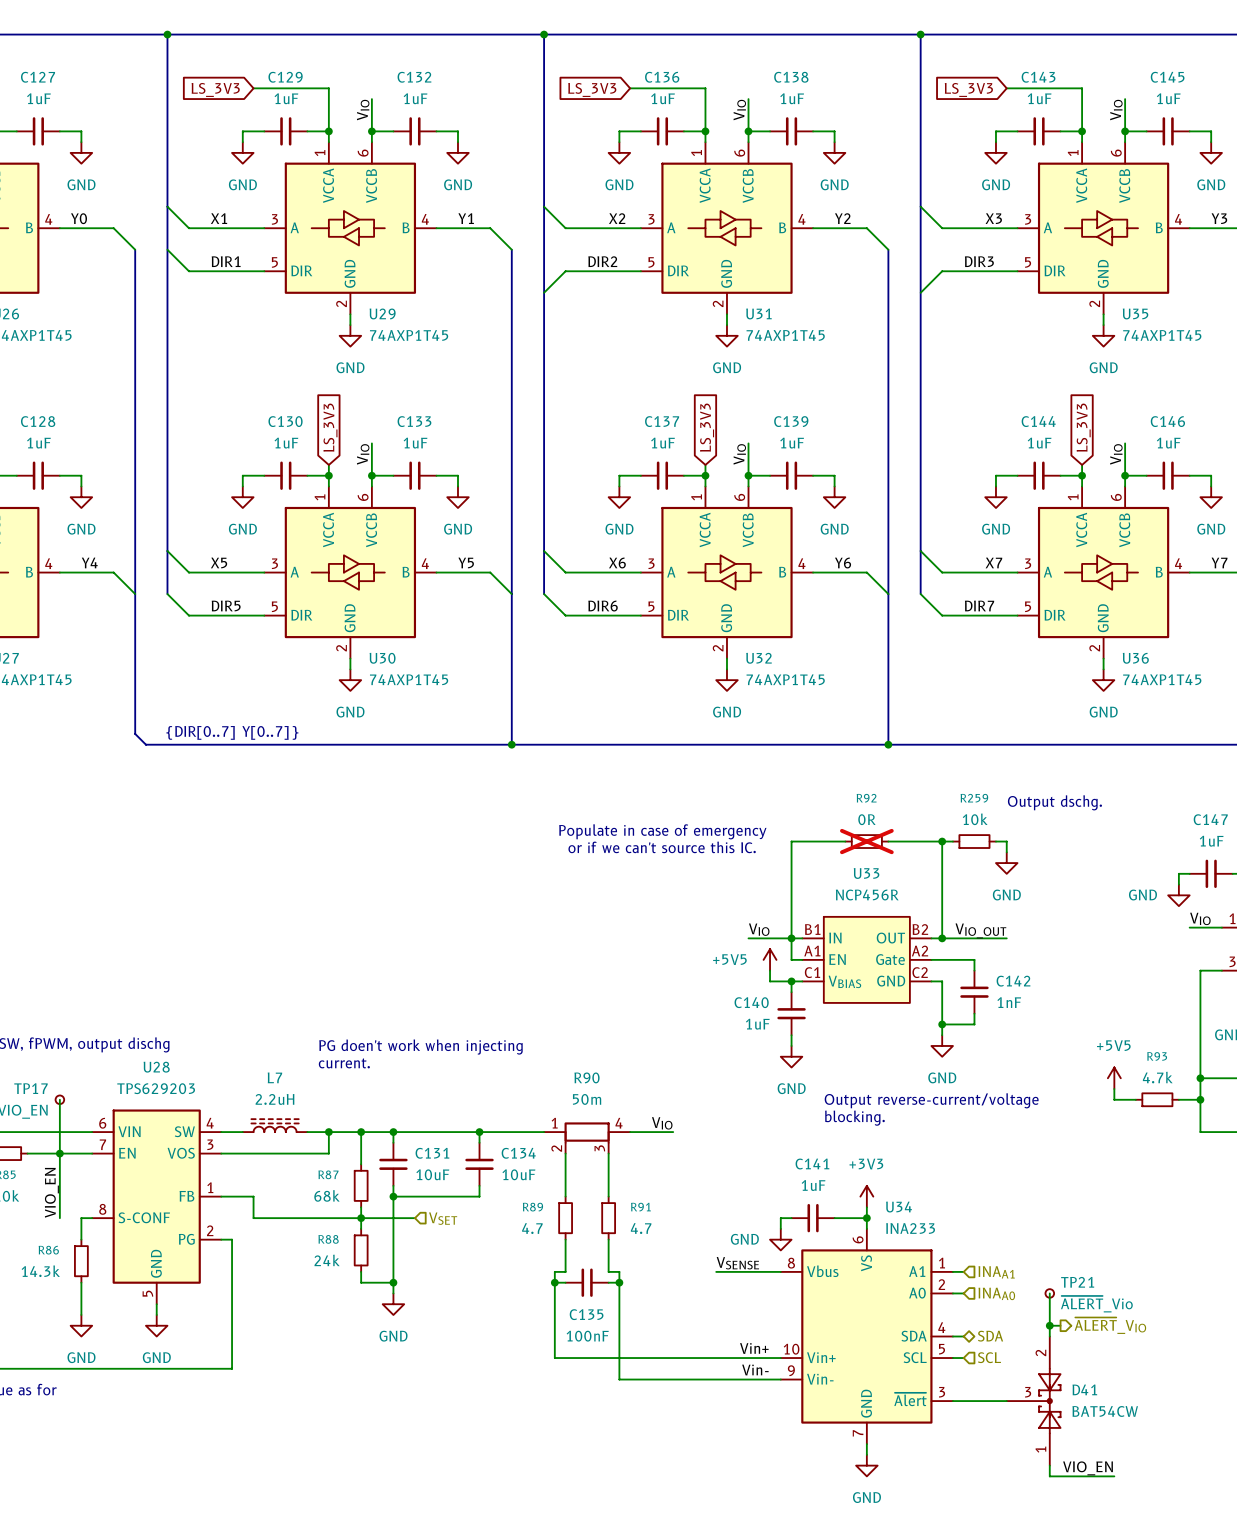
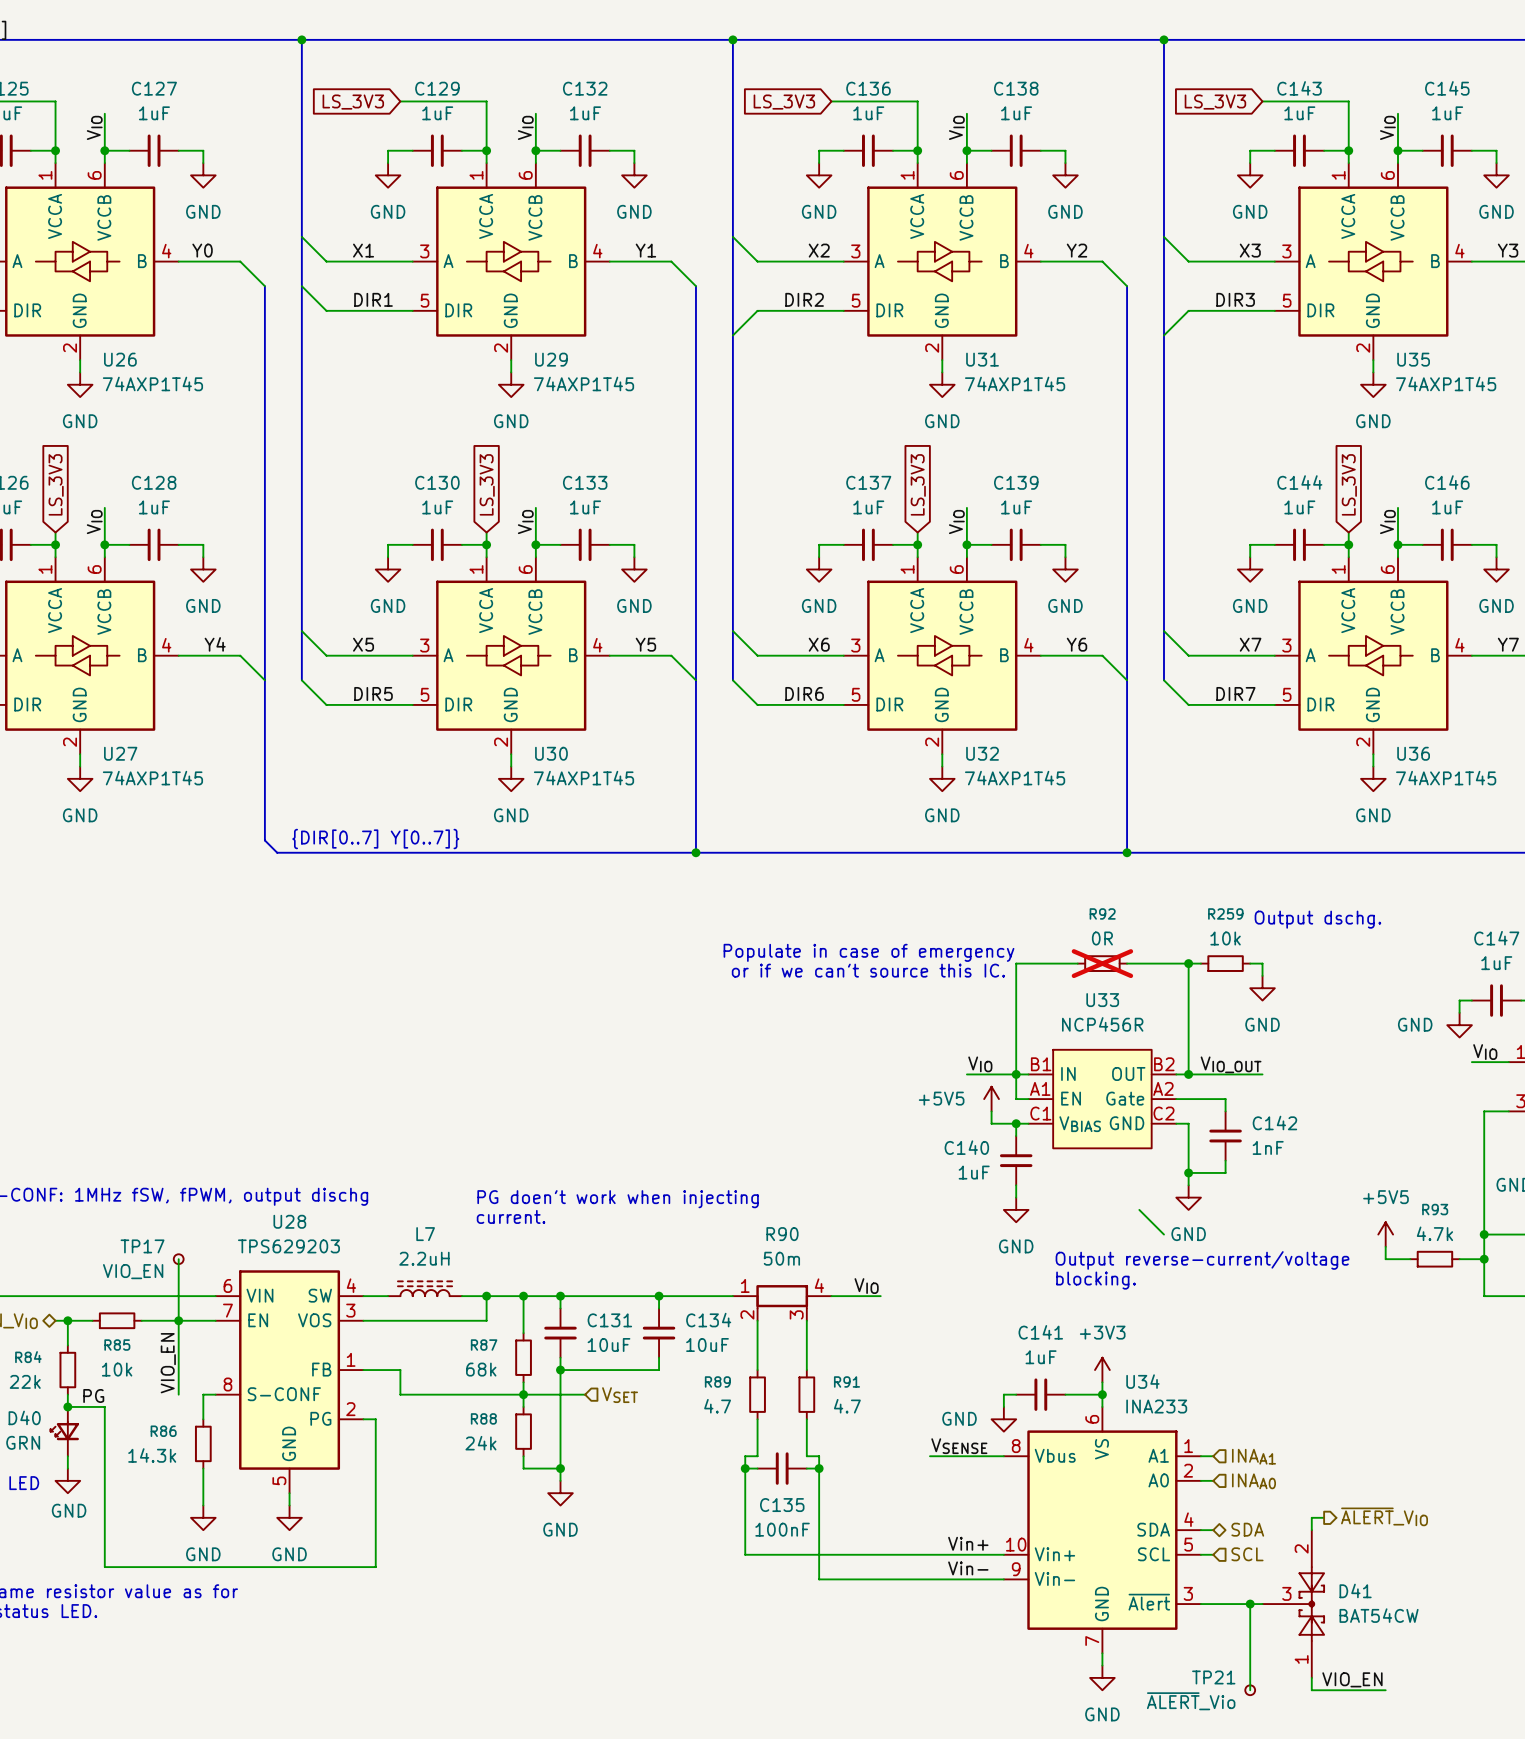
wire: none -> (1139, 1209) (1163, 1234)
TP21 name position: TP21 (1077, 1282) -> TP21 (1213, 1677)
wire: (1049, 1293) (1049, 1325) -> none
TP21 position: (1049, 1293) -> (1250, 1690)
TP21 value position: ~{ALERT}_Vio (1096, 1304) -> ~{ALERT}_Vio (1191, 1701)
junction: (1049, 1325) -> none
wire: none -> (1250, 1604) (1250, 1690)
junction: none -> (1250, 1604)

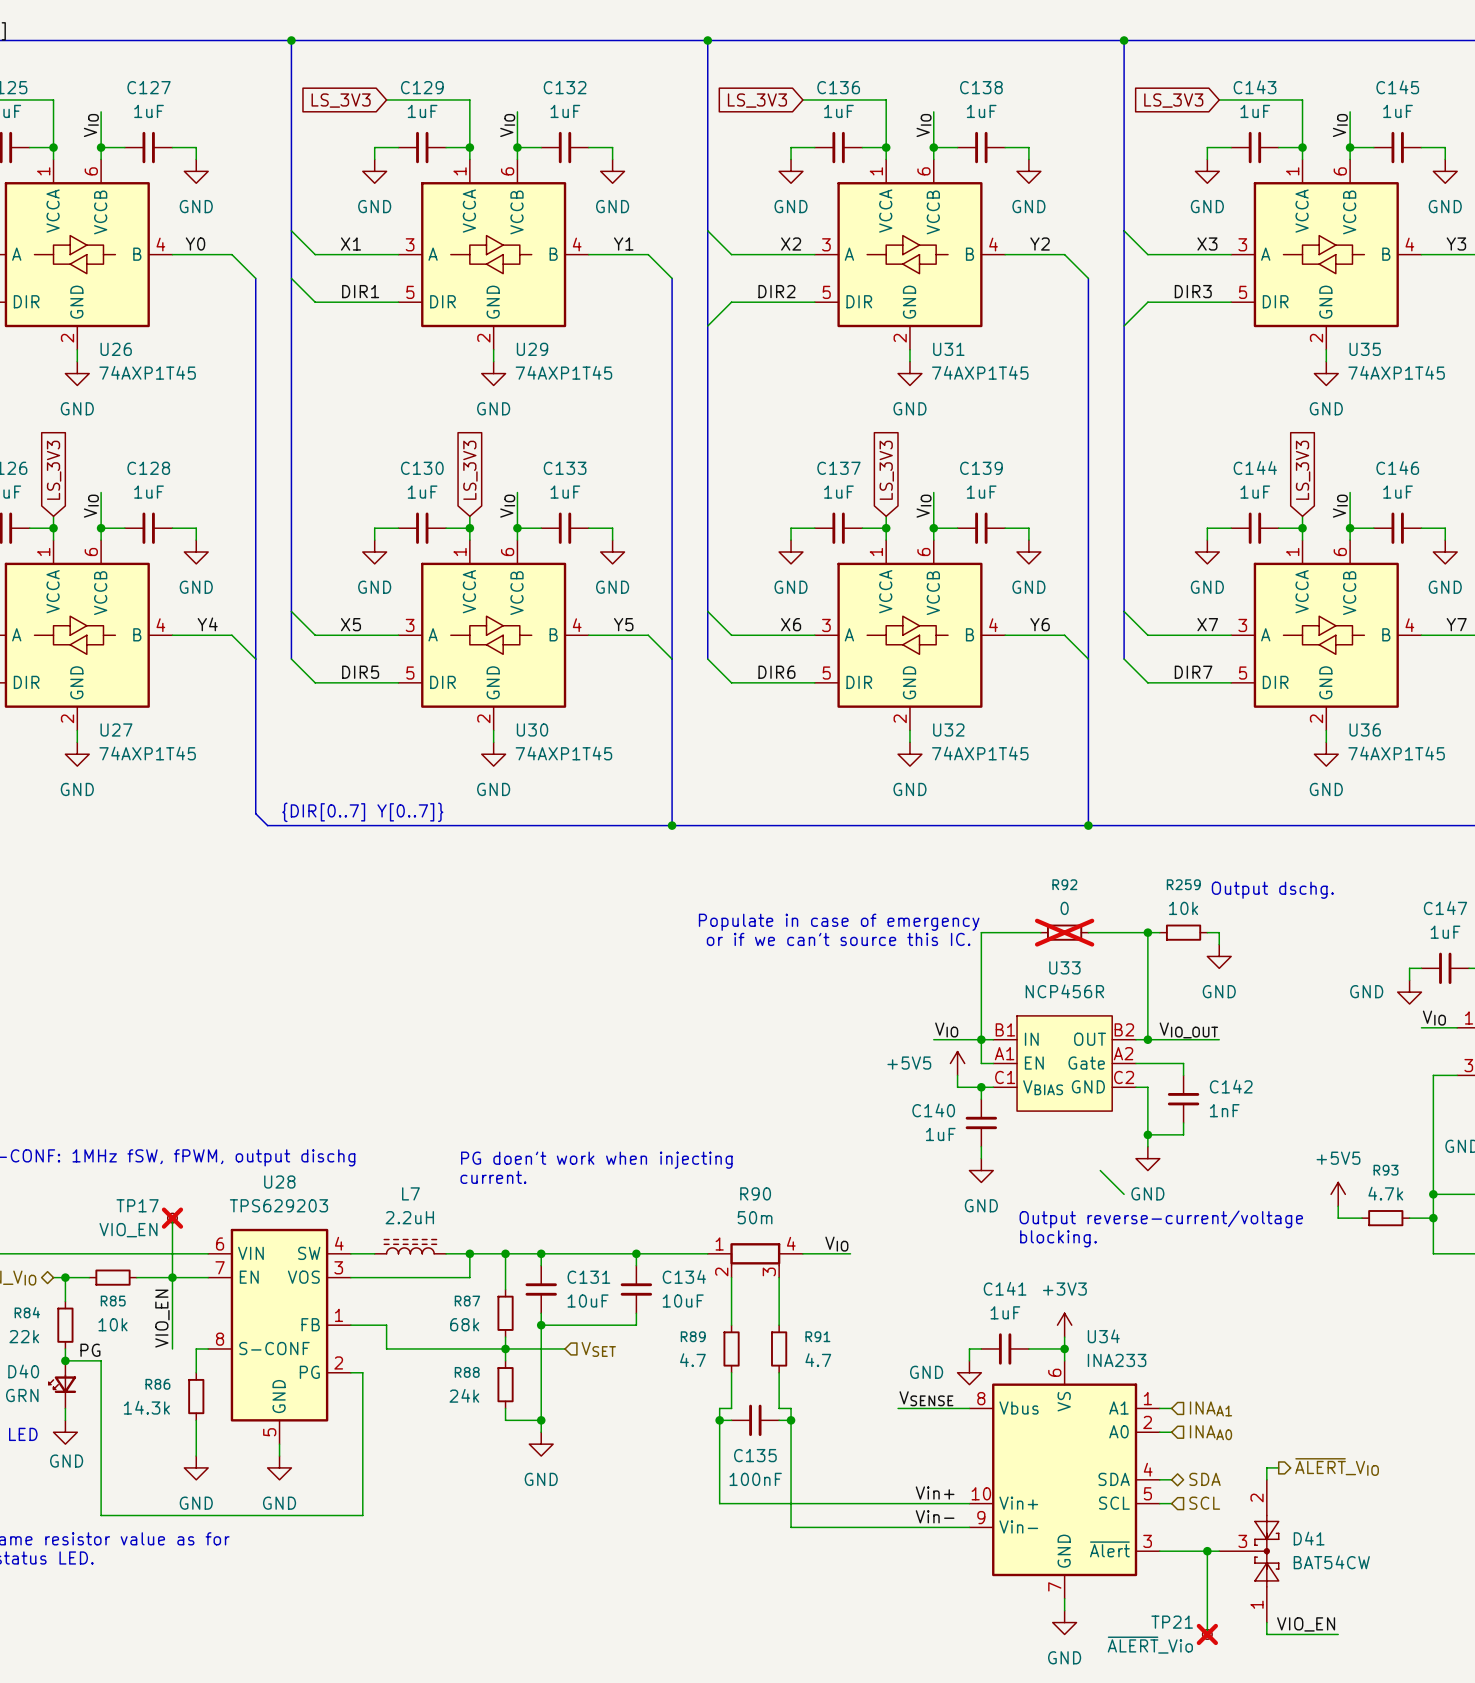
R92 value: 0R (1102, 938) -> 0 (1064, 908)
TP17 do-not-place cross: none -> (172, 1218)
TP21 do-not-place cross: none -> (1207, 1634)

